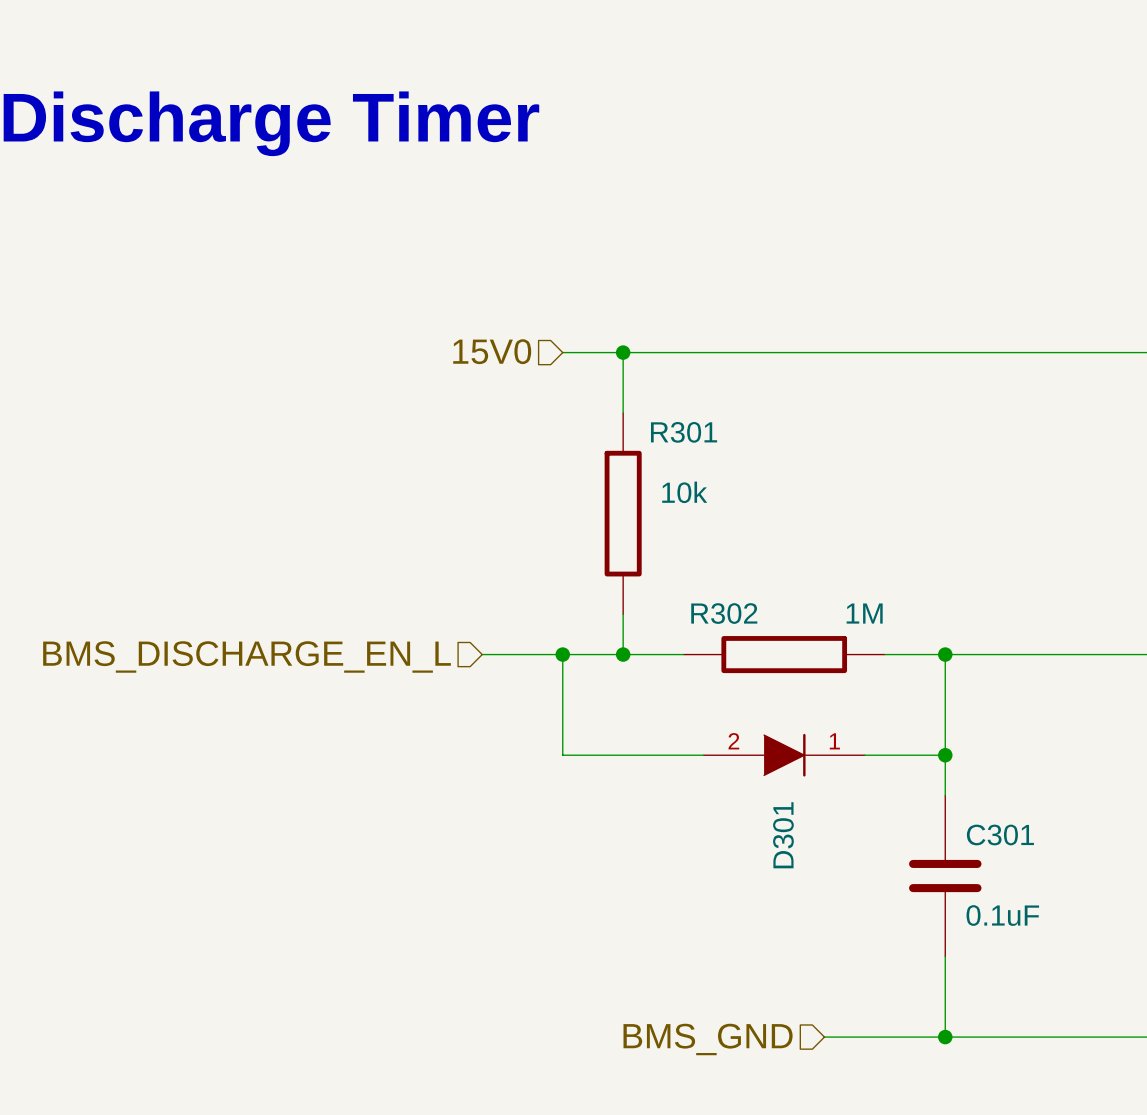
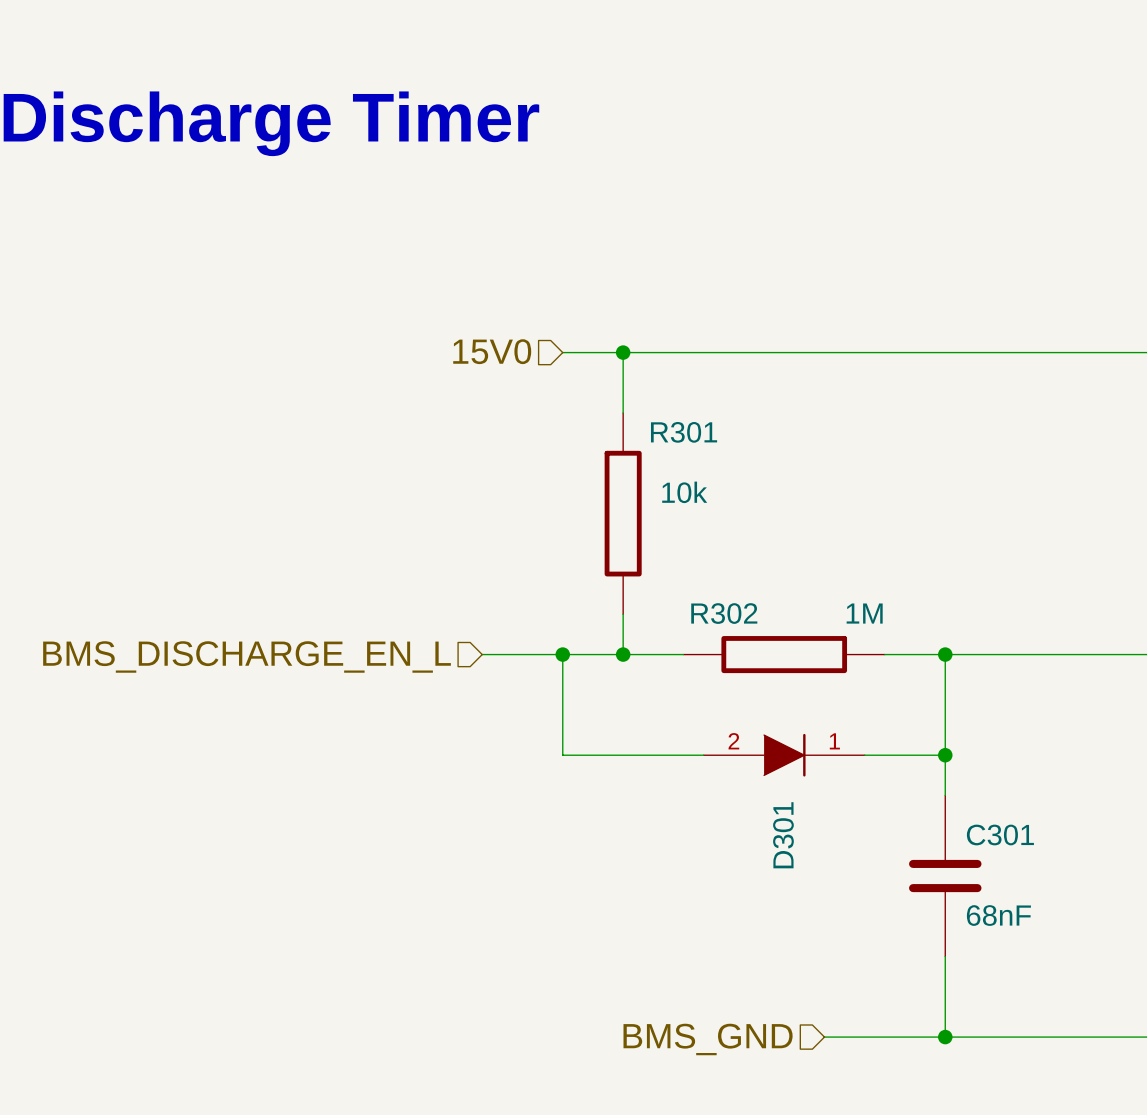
C301 value: 0.1uF (1002, 915) -> 68nF (998, 915)

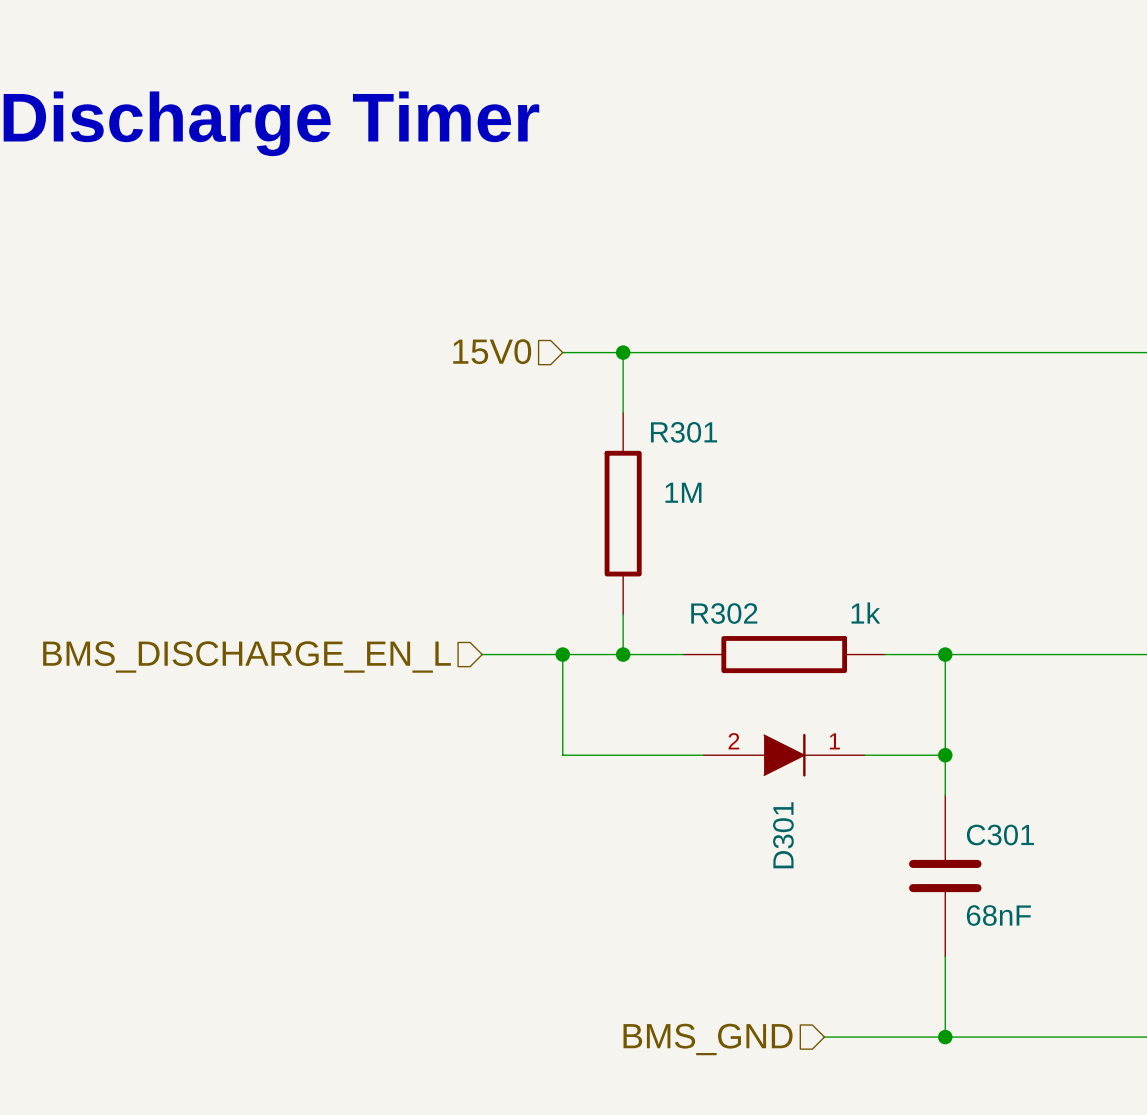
R301 value: 10k (684, 492) -> 1M (683, 492)
R302 value: 1M (864, 613) -> 1k (865, 613)

